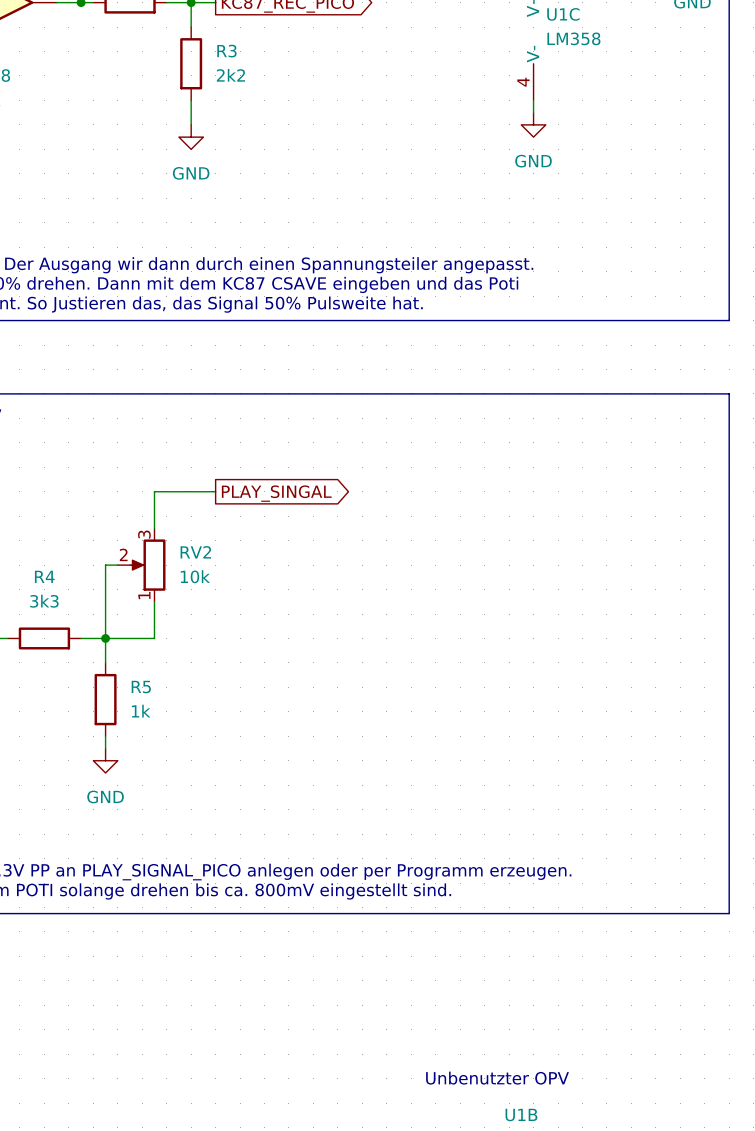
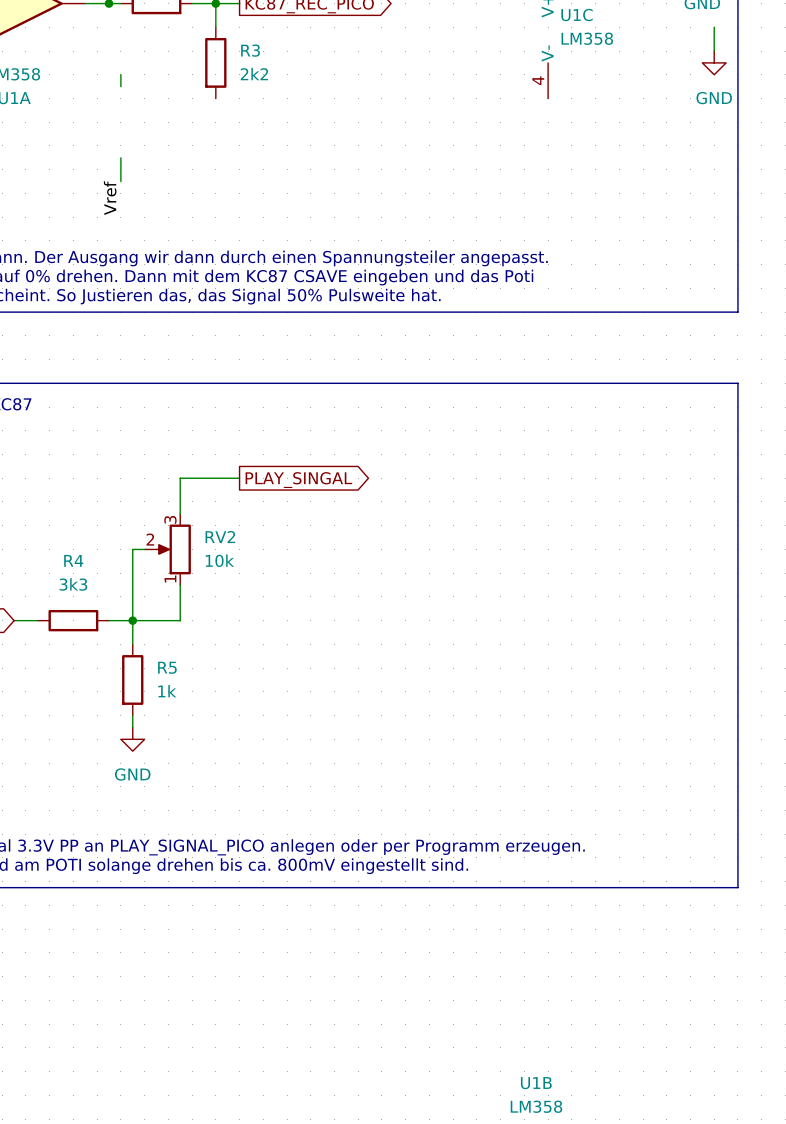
wire: none -> (714, 27) (714, 51)
wire: none -> (120, 74) (120, 86)
wire: (191, 100) (191, 124) -> (120, 157) (120, 181)
wire: (533, 100) (533, 112) -> none
power symbol position: GND (533, 124) -> GND (714, 62)
power symbol: GND (191, 137) -> none
label: none -> Vref (110, 198)
text: Unbenutzter OPV (497, 1078) -> none

